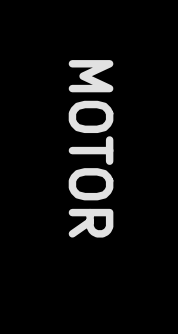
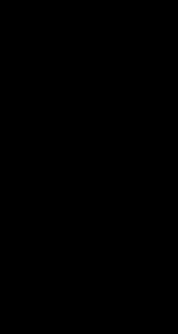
text: MOTOR (91, 148) -> none

